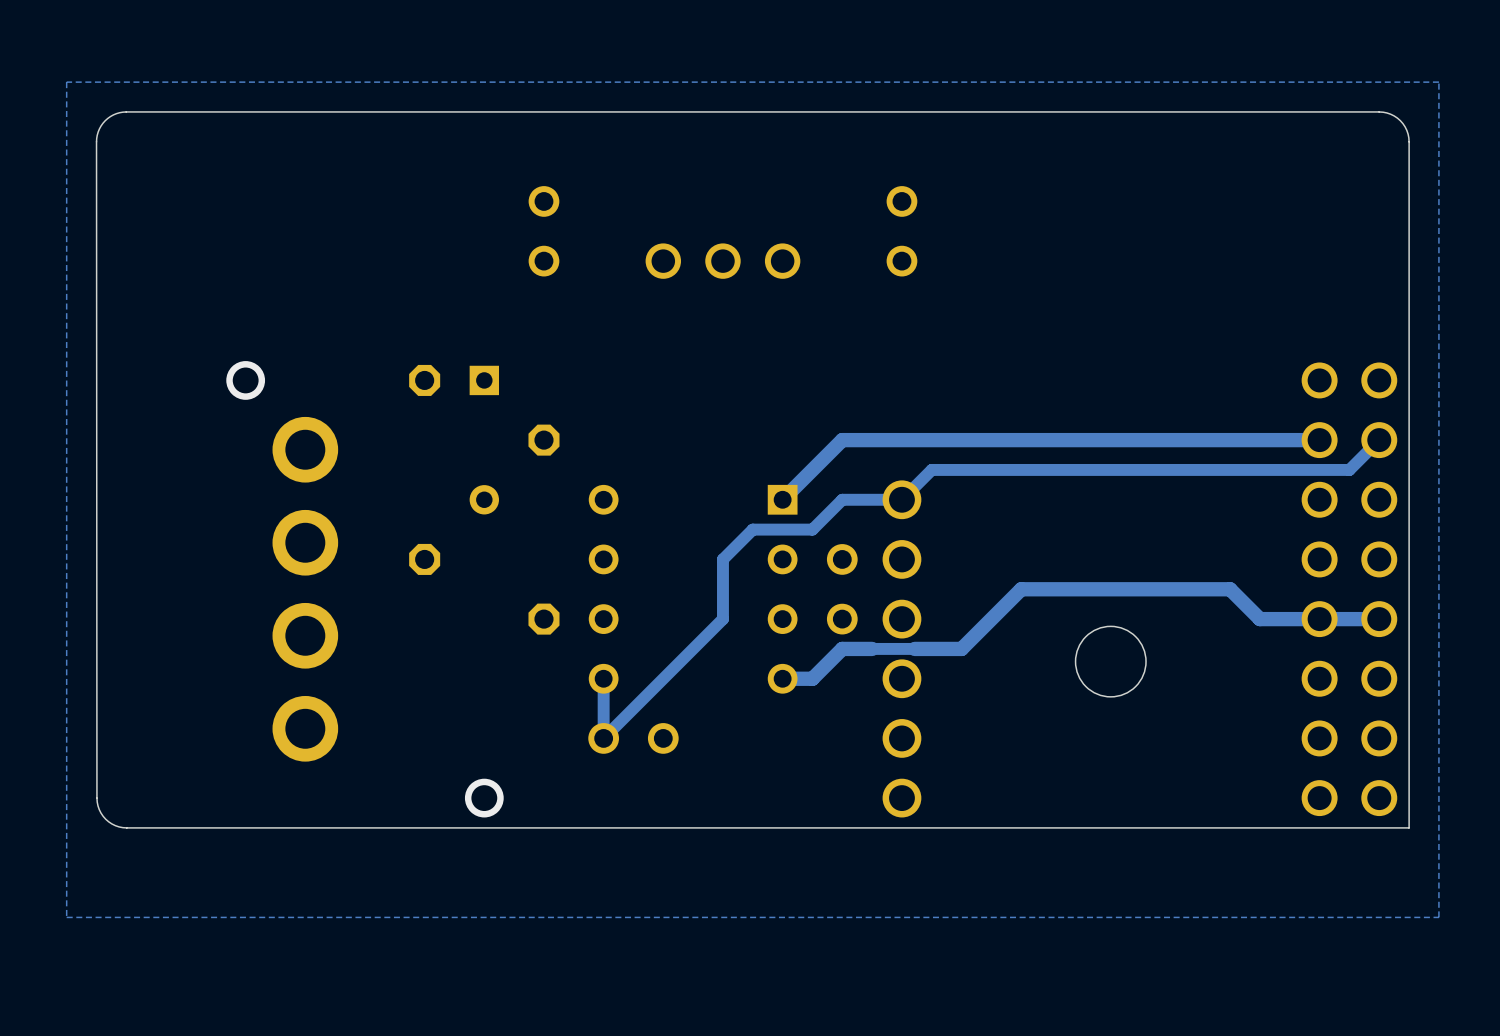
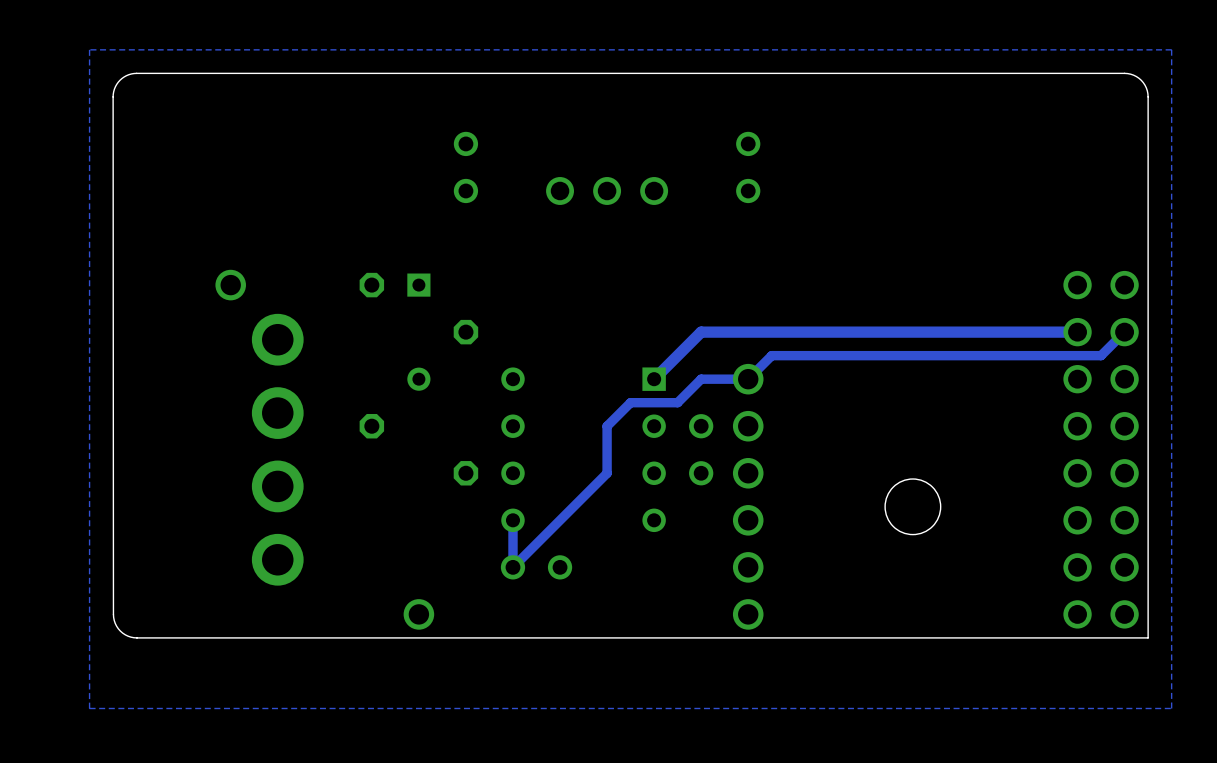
track: (1379, 619) (1259, 619) (1230, 589) (1021, 589) (961, 648) (842, 648) (812, 678) (782, 678) -> none

